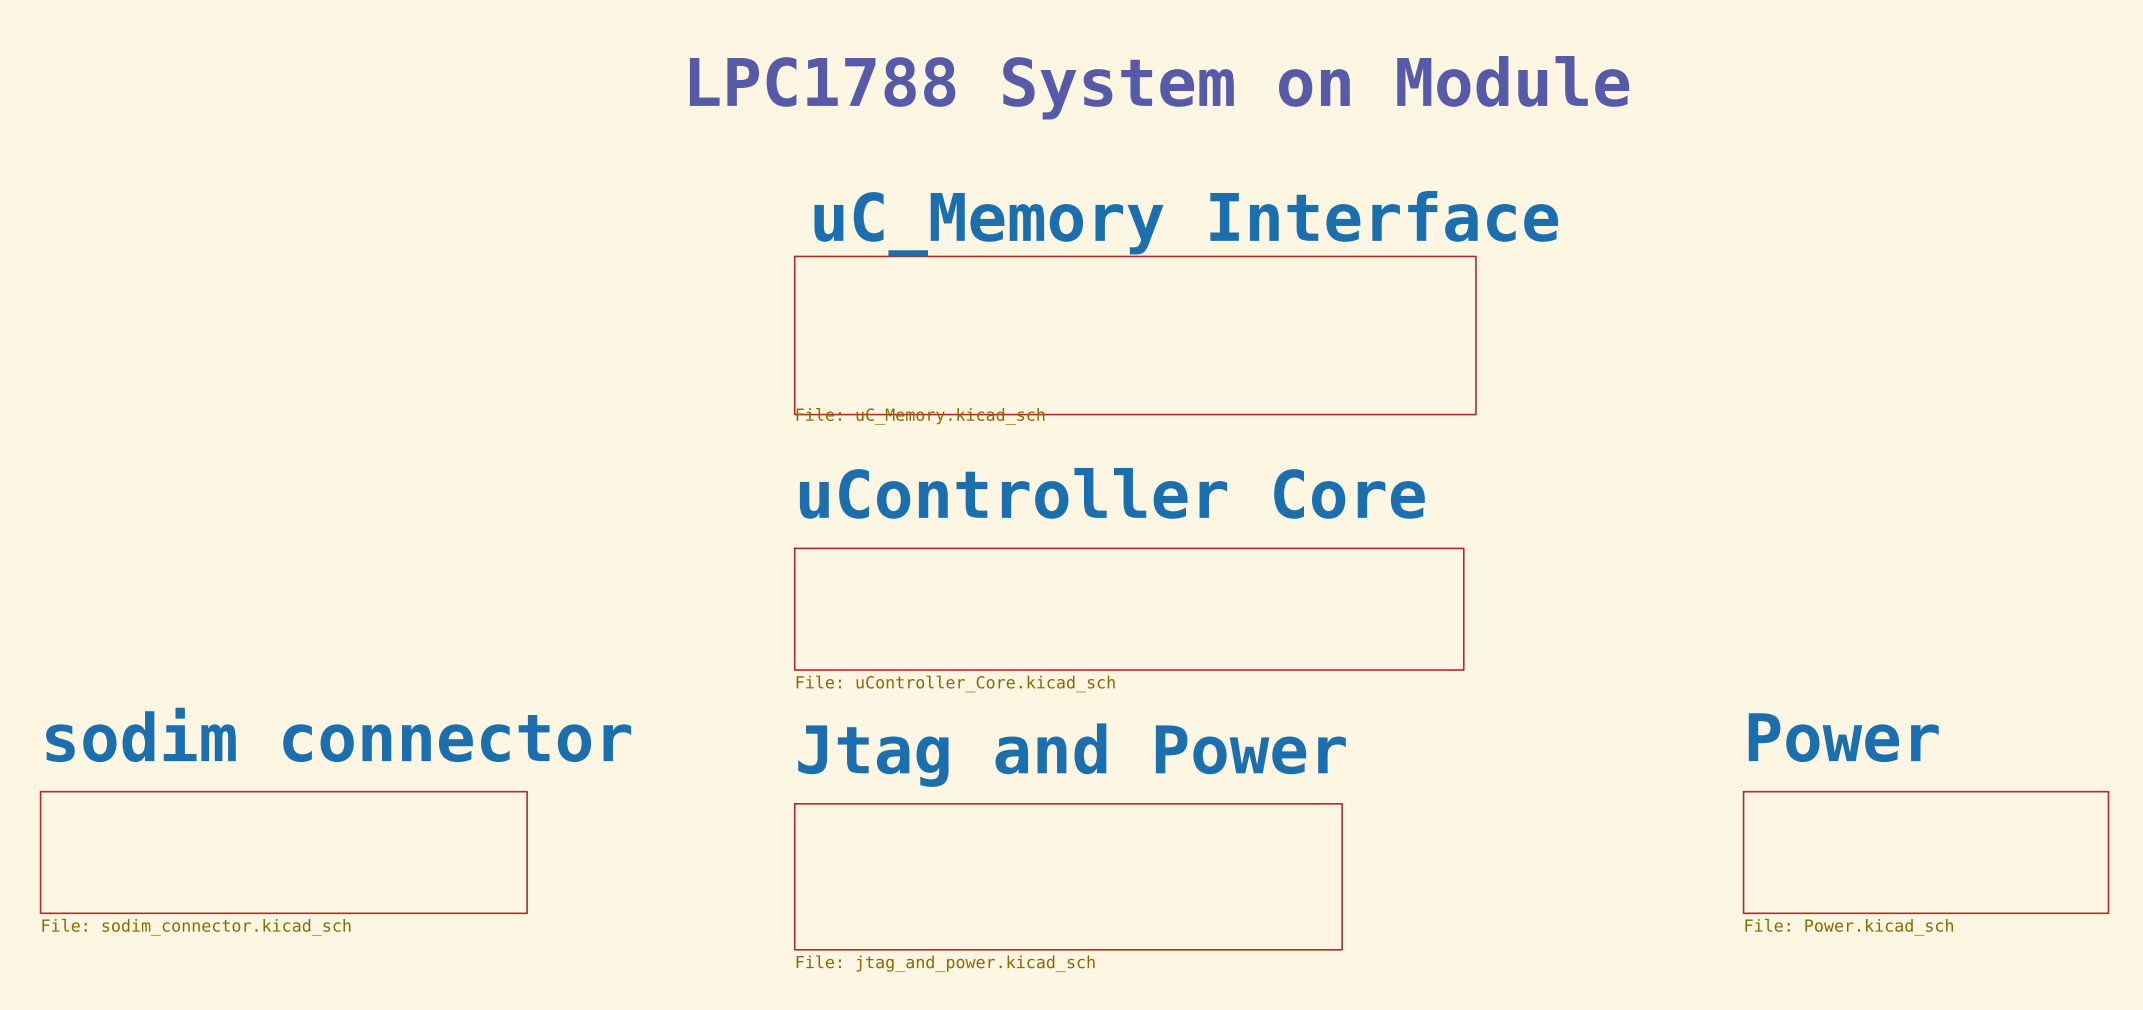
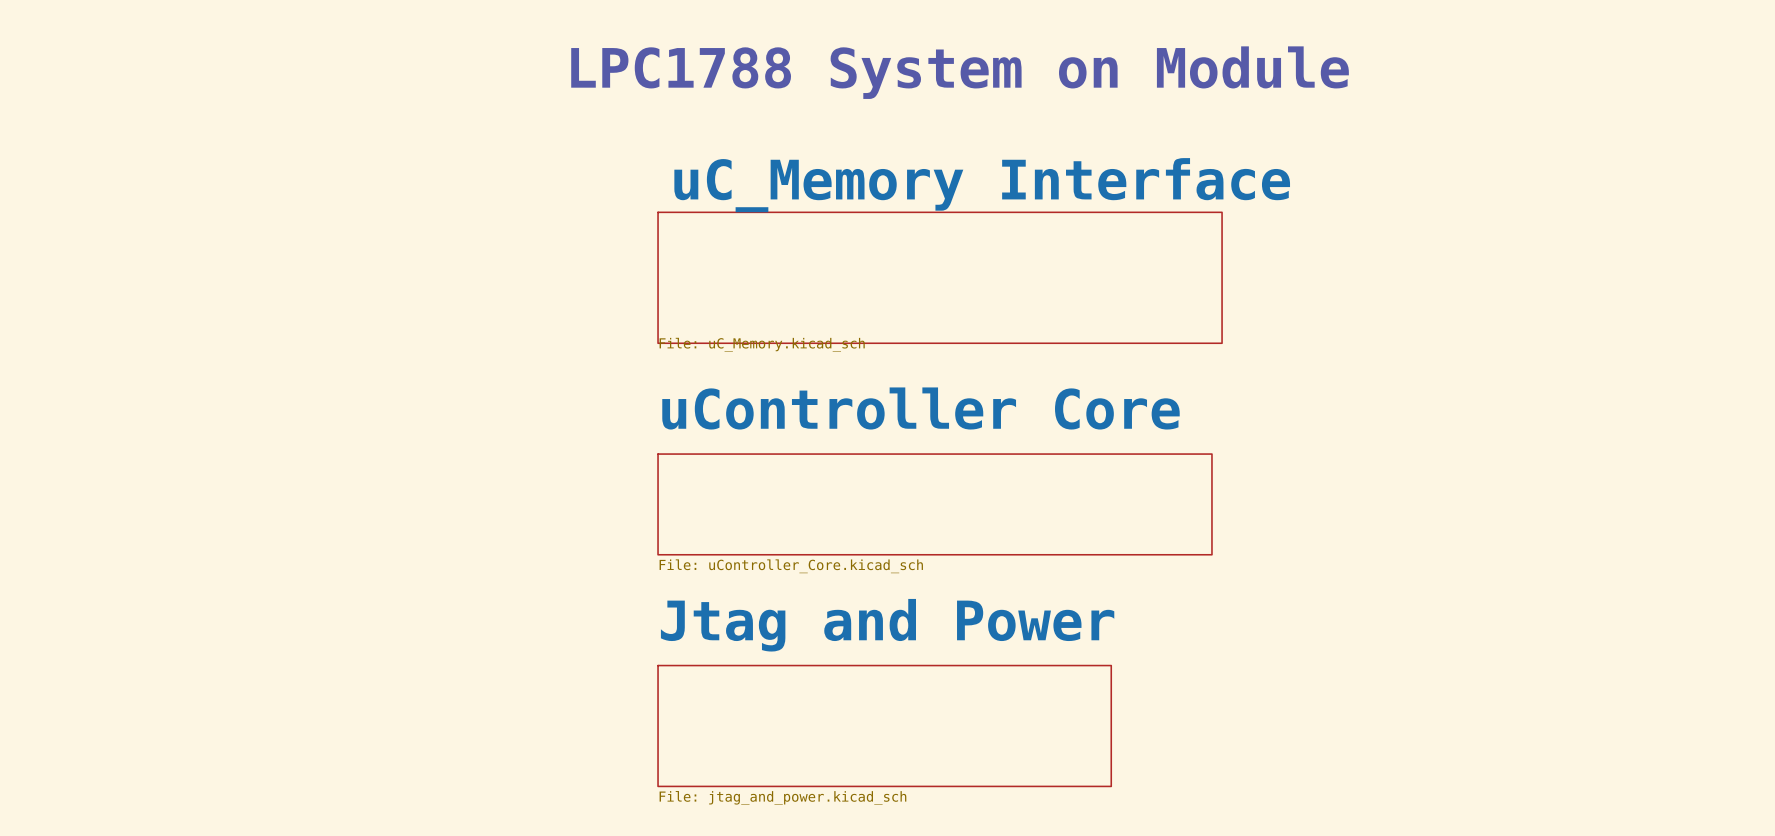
sheet sodim connector: File: sodim_connector.kicad_sch (283, 852) -> none
sheet Power: File: Power.kicad_sch (1926, 852) -> none

